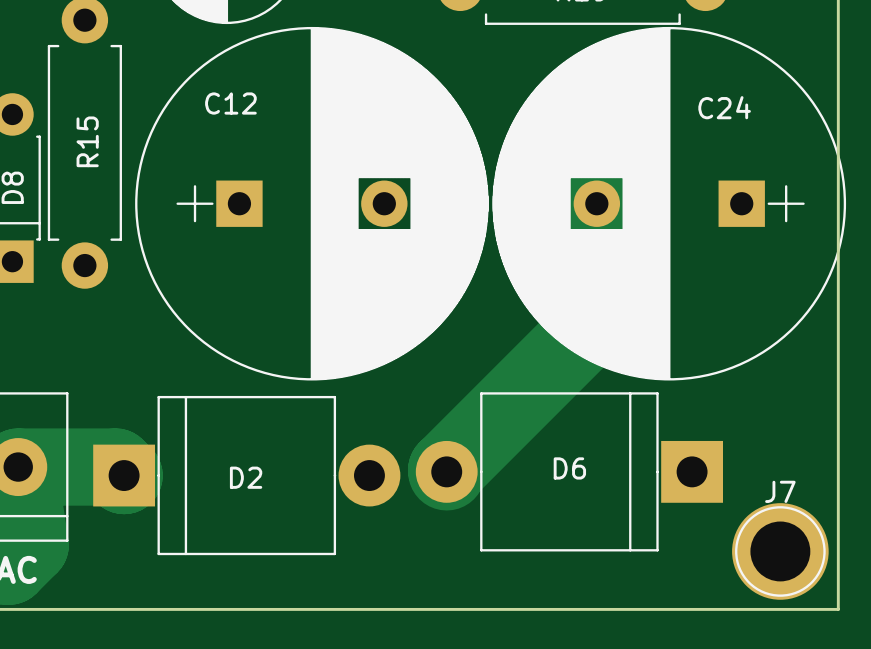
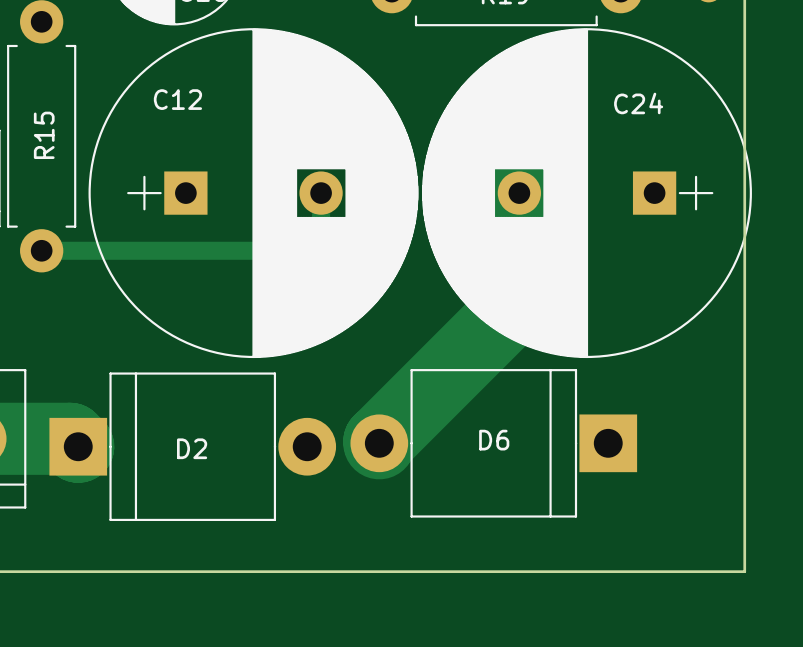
track: none -> (321, 193) (321, 221) (291, 250) (41, 250)
J7: (780, 551) -> none

